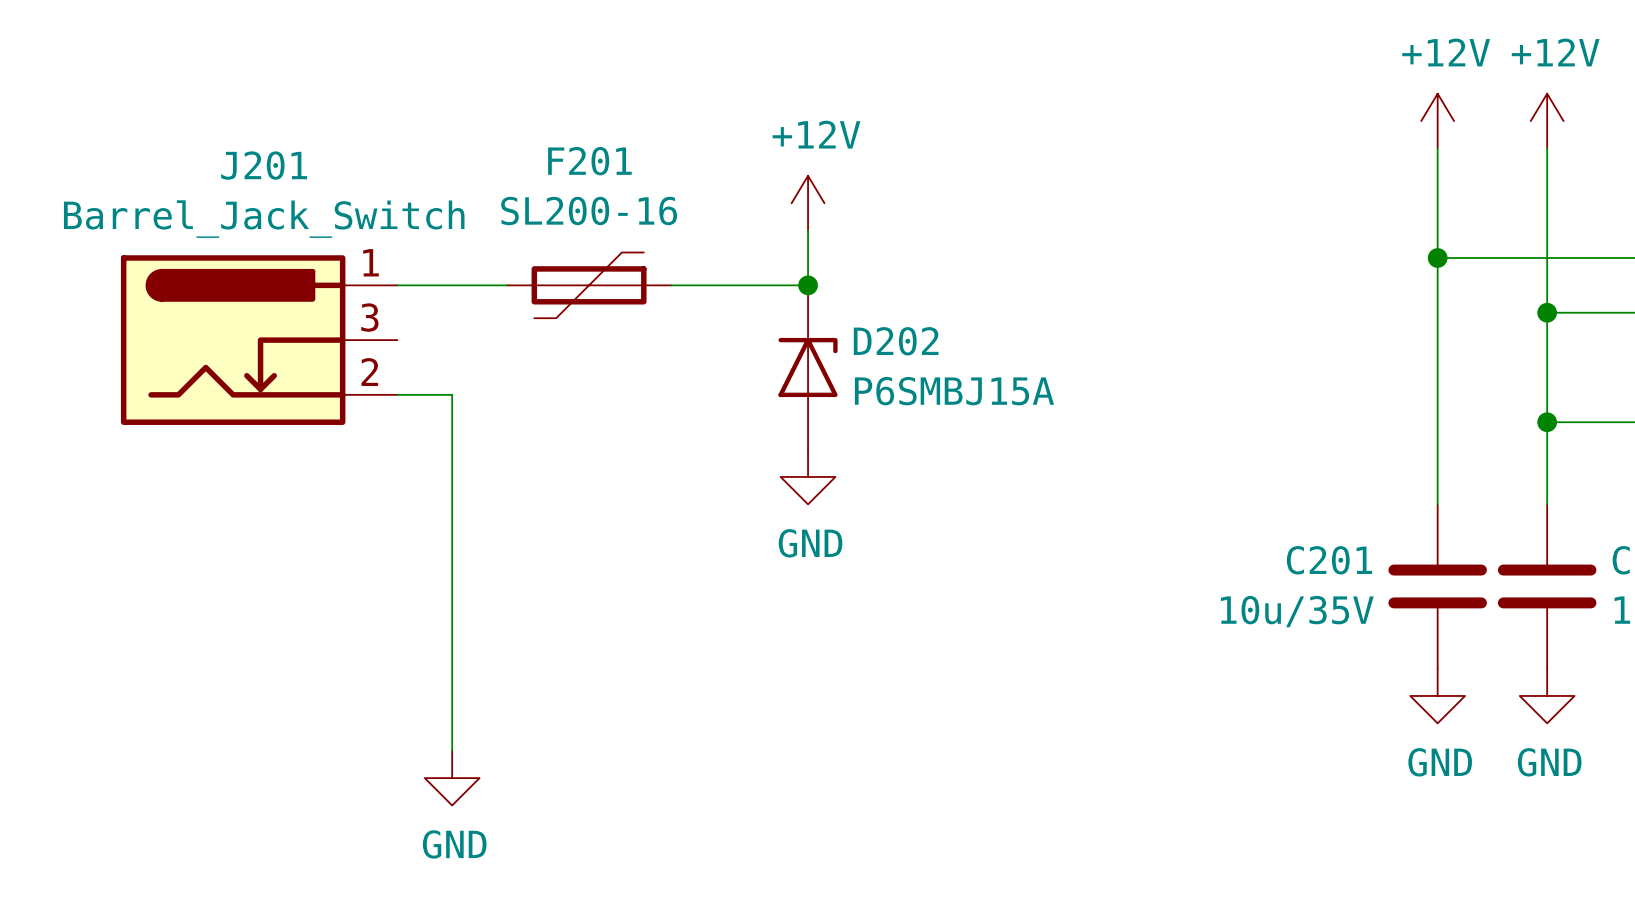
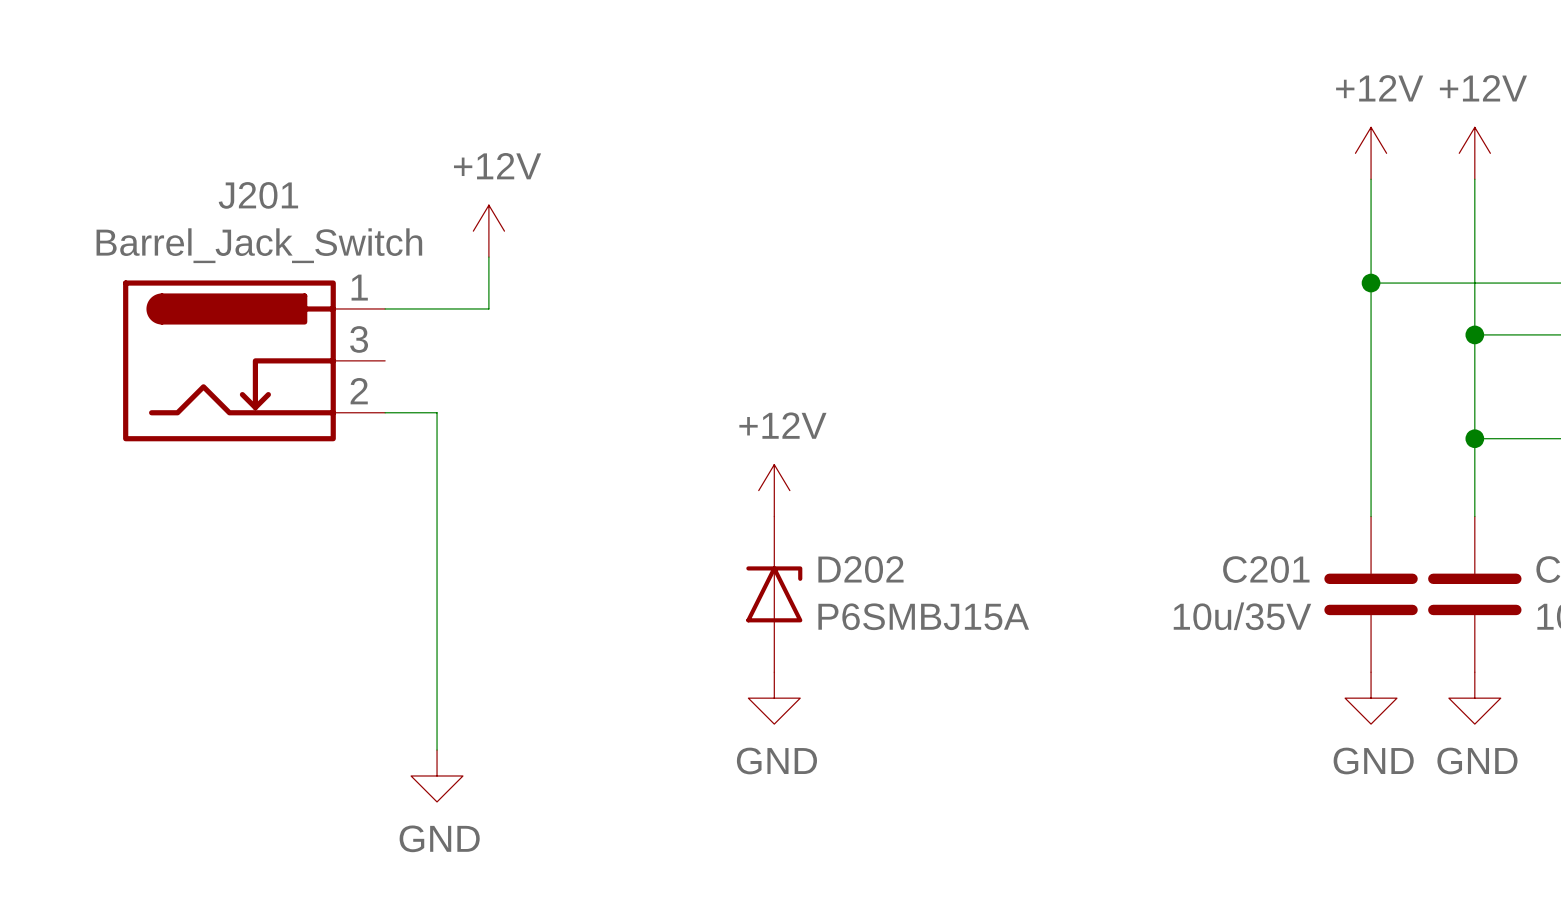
power symbol position: +12V (808, 203) -> +12V (488, 231)
wire: none -> (488, 257) (488, 308)
wire: (808, 230) (808, 285) (671, 285) -> none
F201: SL200-16 (589, 285) -> none
junction: (808, 285) -> none
D202 position: (808, 367) -> (774, 594)
power symbol: GND (808, 476) -> +12V (774, 490)
power symbol: none -> GND (774, 698)

